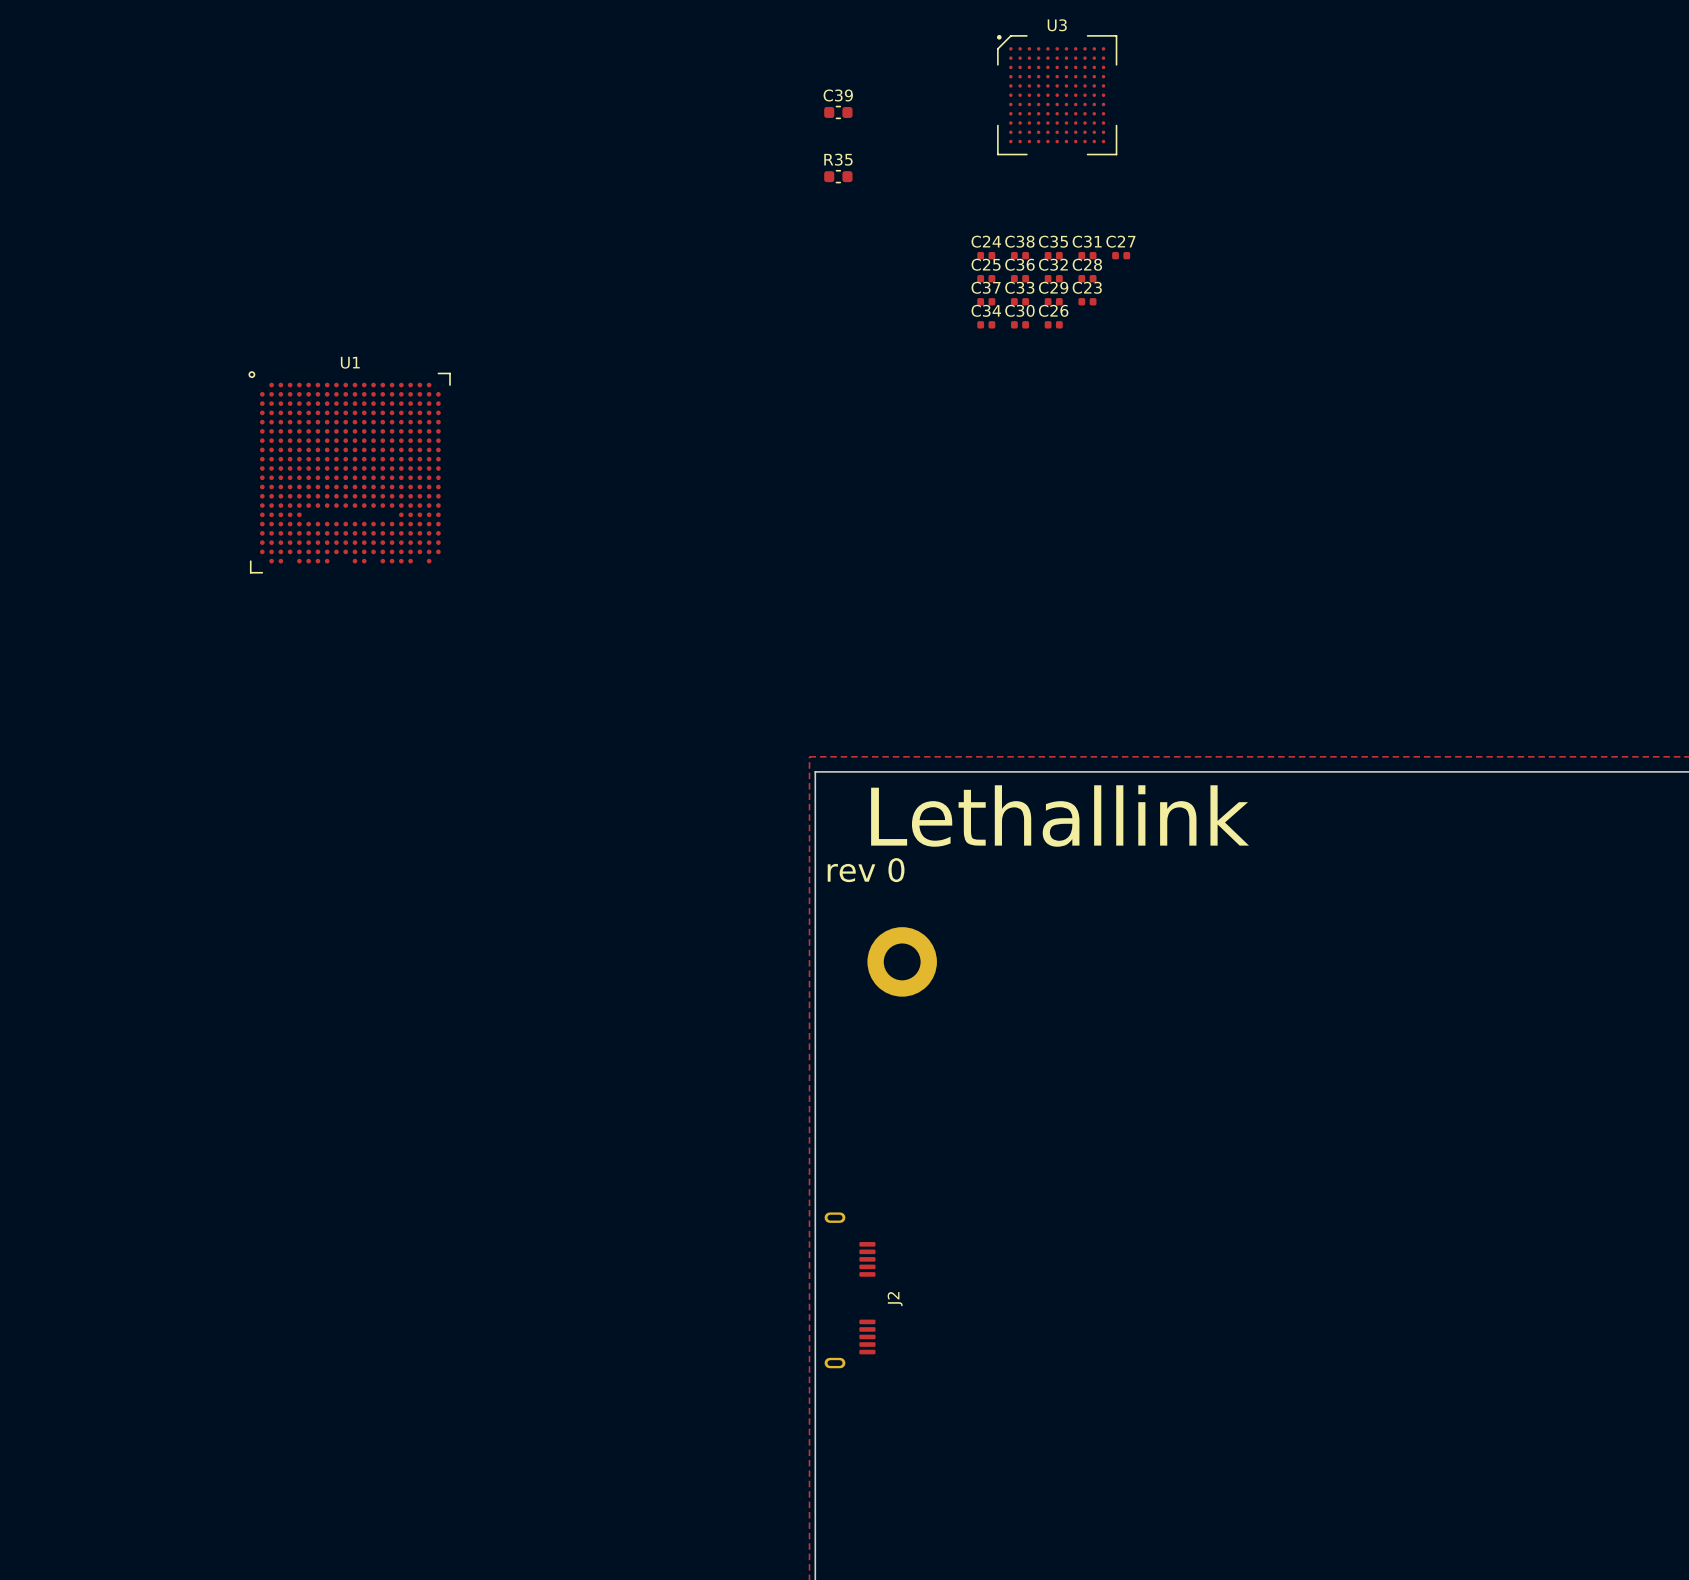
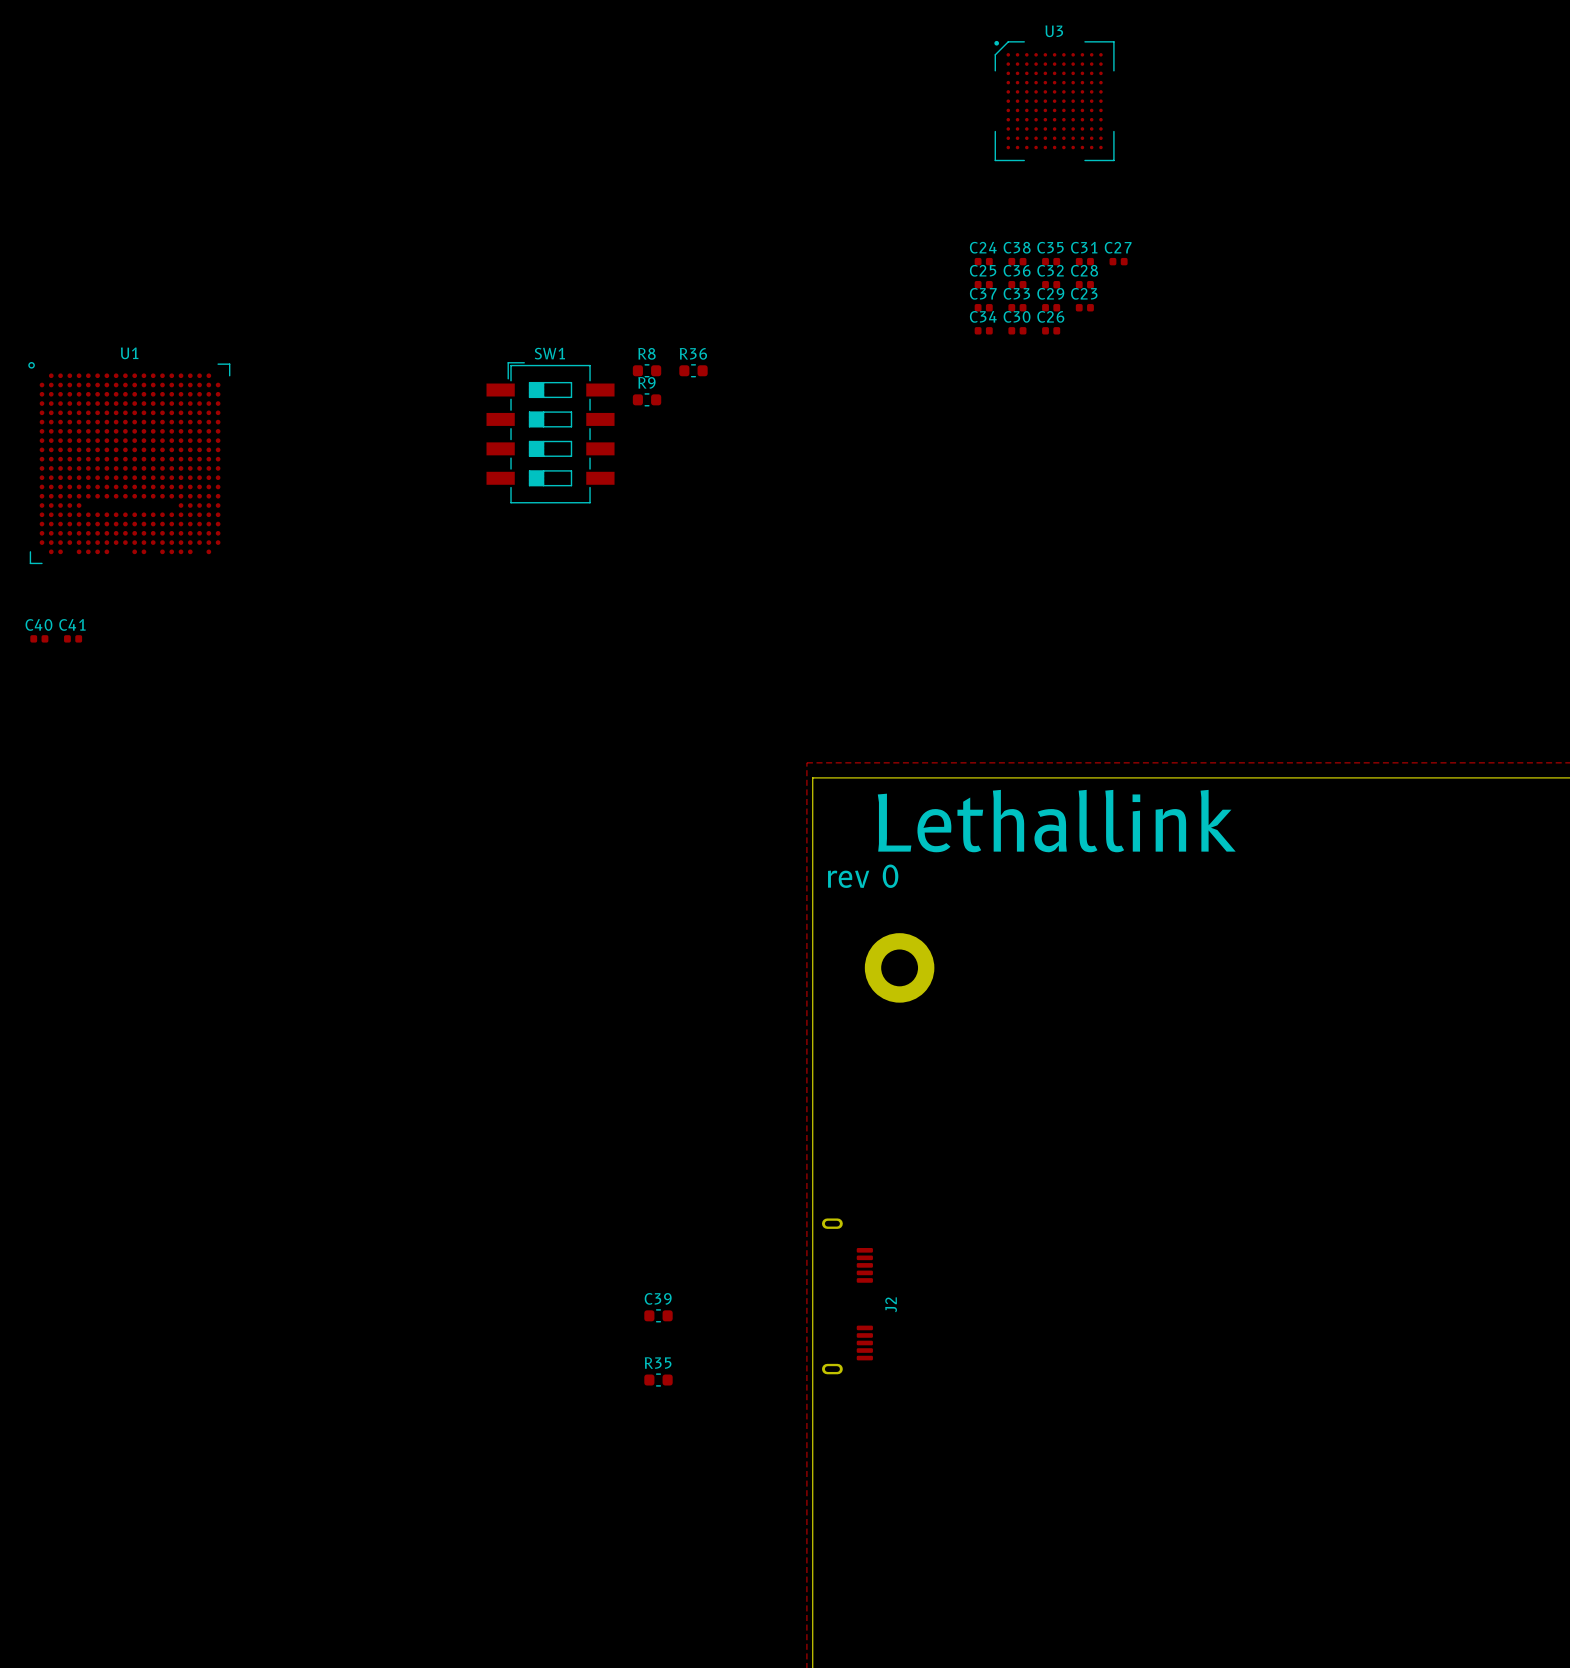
C39 position: (838, 112) -> (658, 1315)
R35 position: (838, 176) -> (658, 1380)
R8: none -> (647, 370)
R36: none -> (693, 370)
R9: none -> (647, 399)
SW1: none -> (550, 432)
U1 position: (349, 472) -> (129, 463)
C40: none -> (39, 638)
C41: none -> (73, 638)

